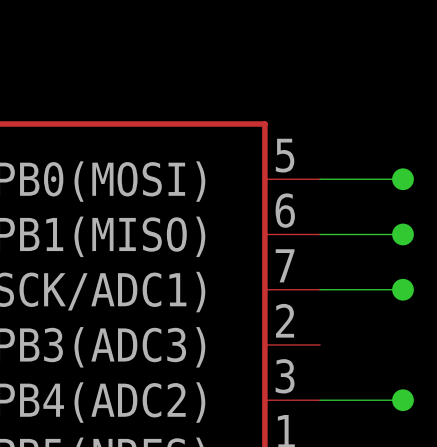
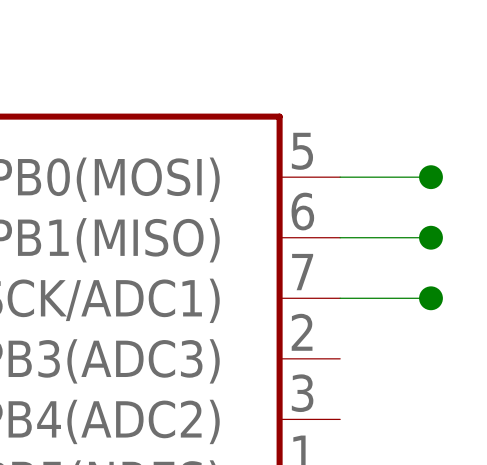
wire: (320, 400) (403, 400) -> none
junction: (403, 400) -> none

